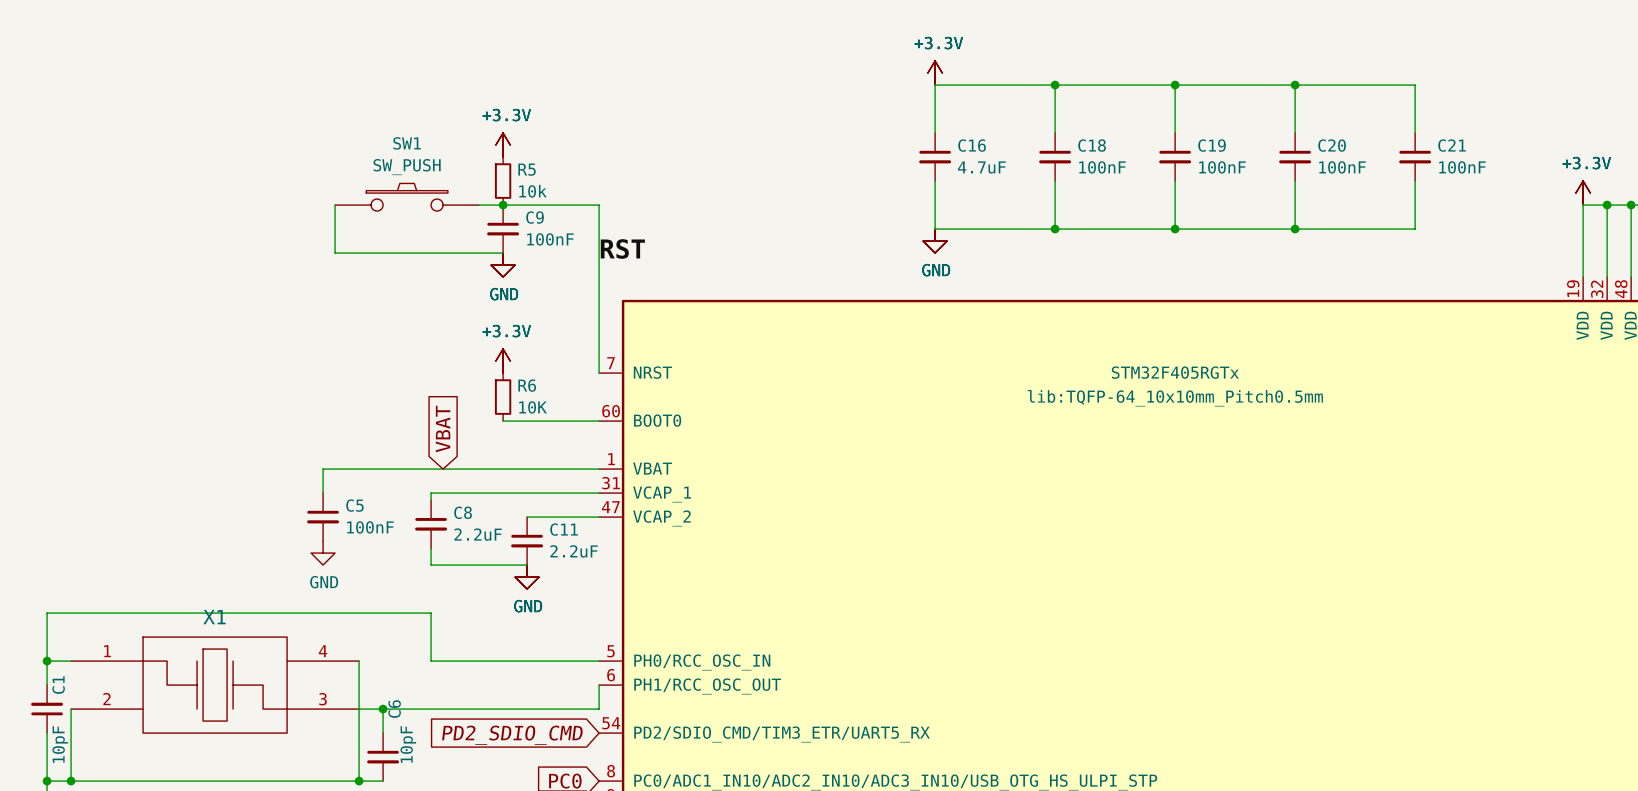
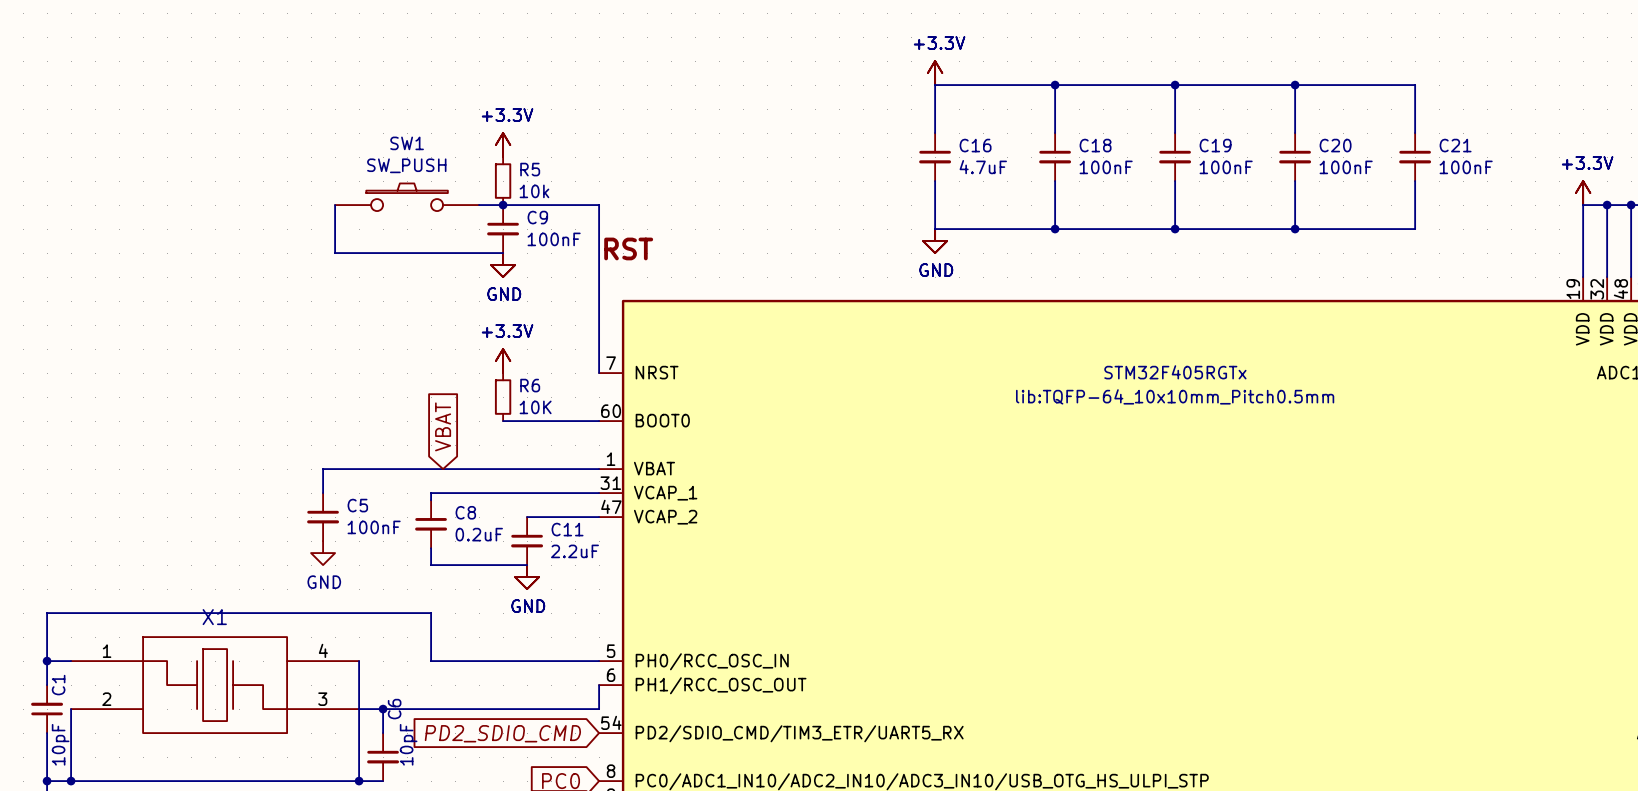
C8 value: 2.2uF (478, 534) -> 0.2uF (479, 534)

